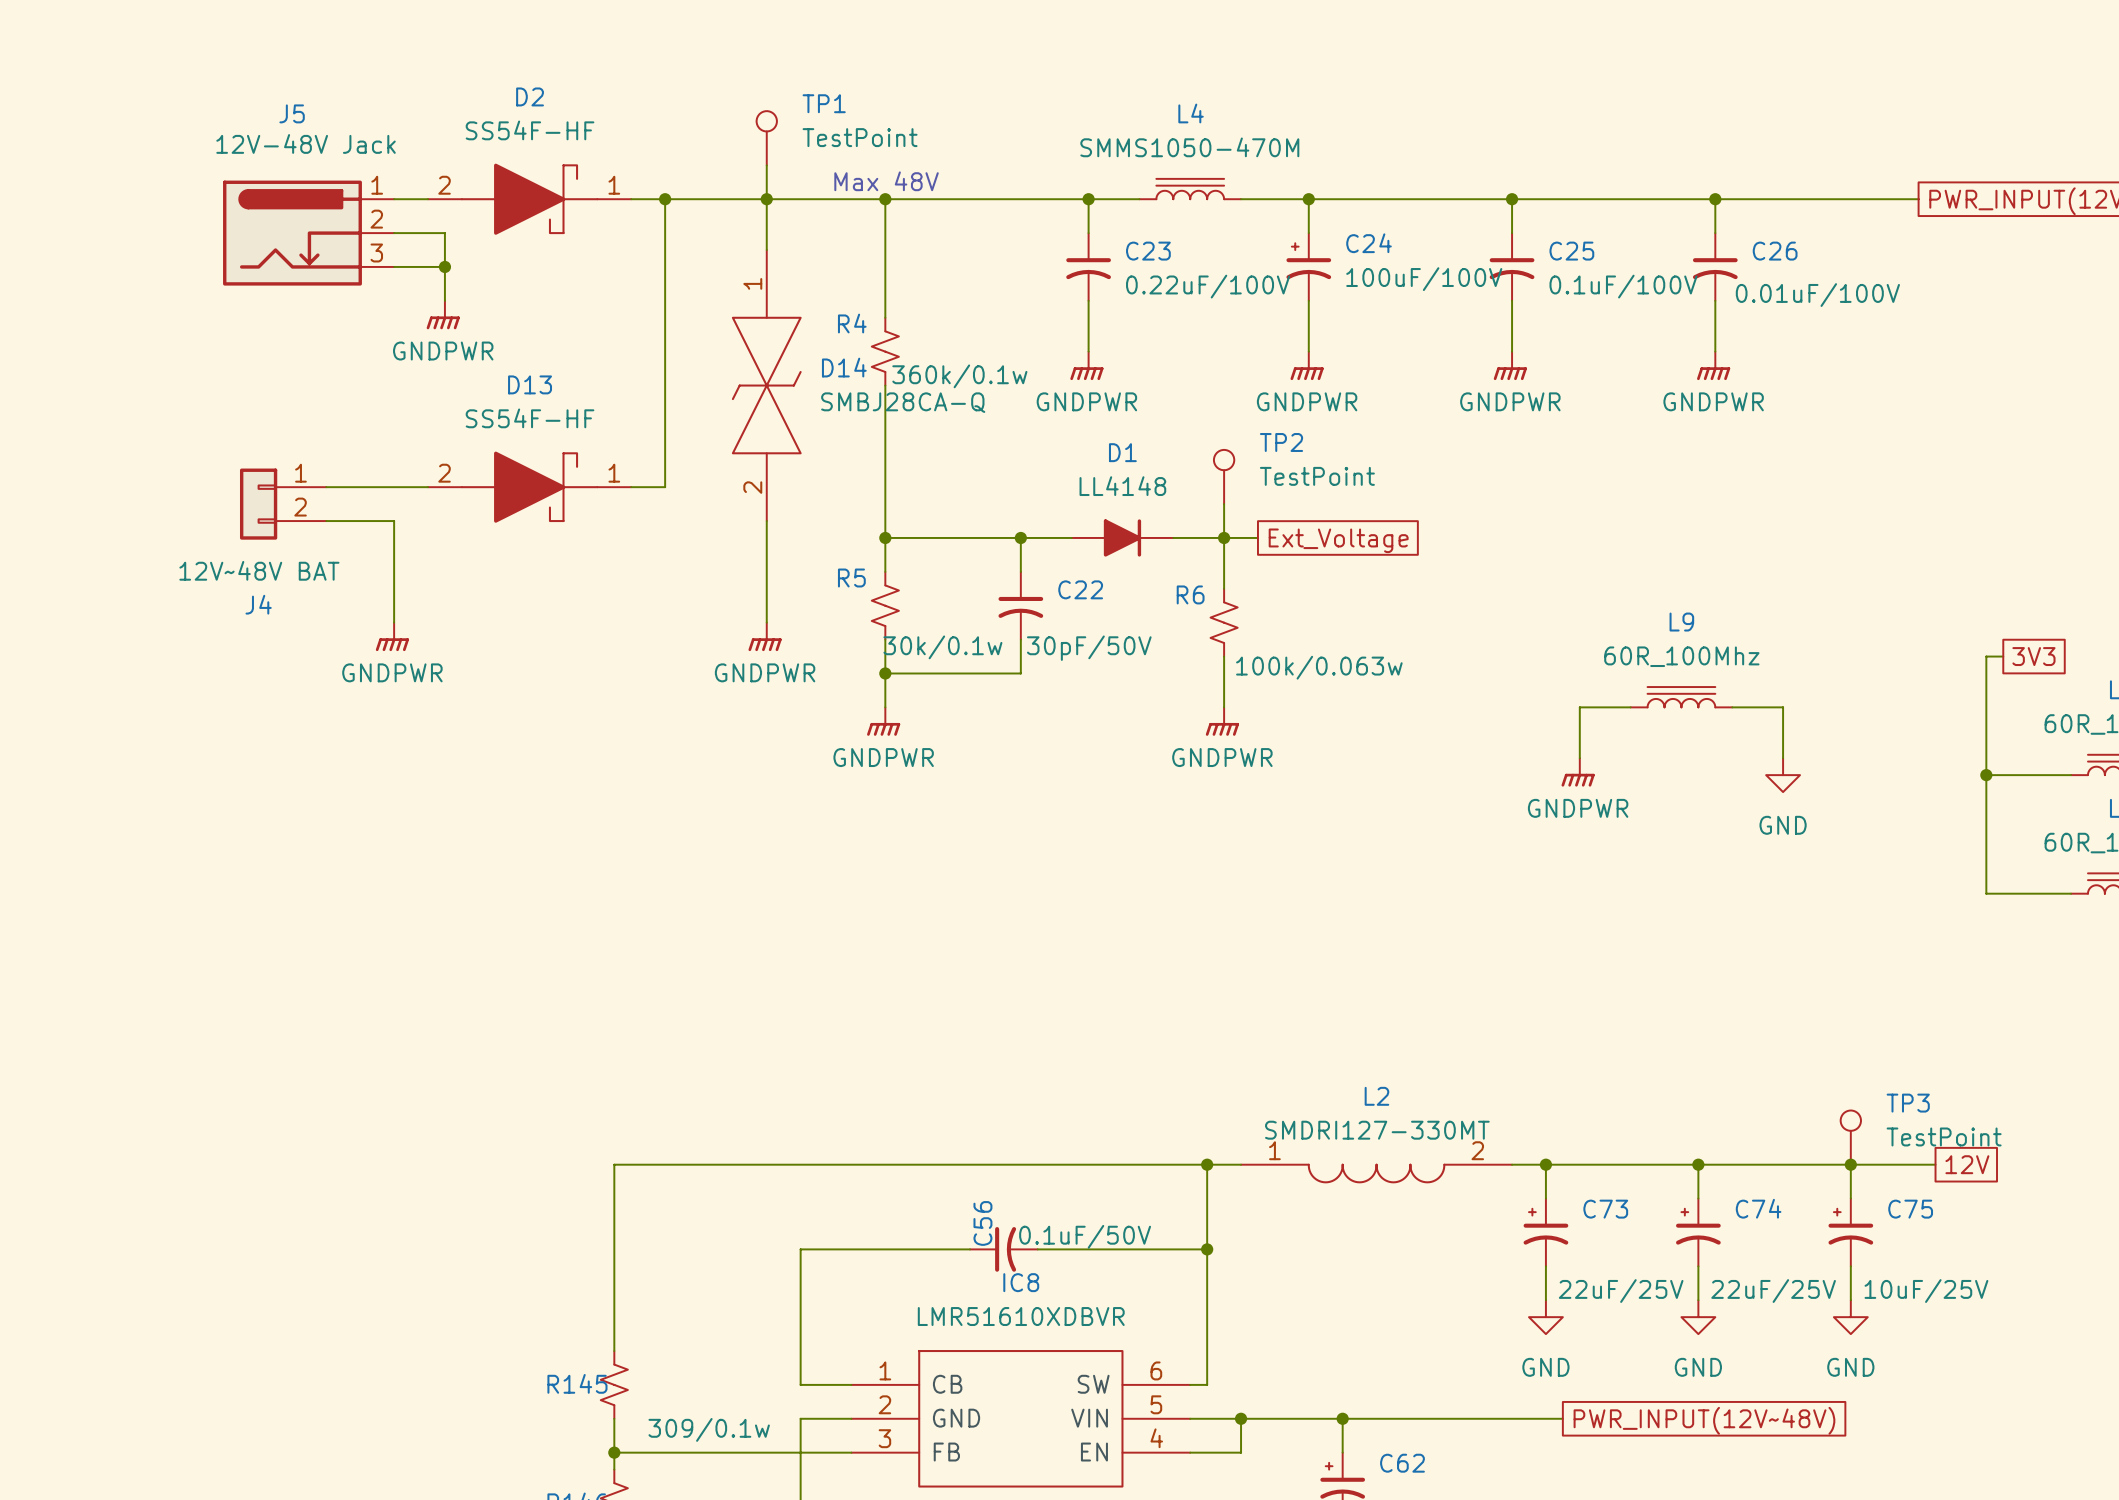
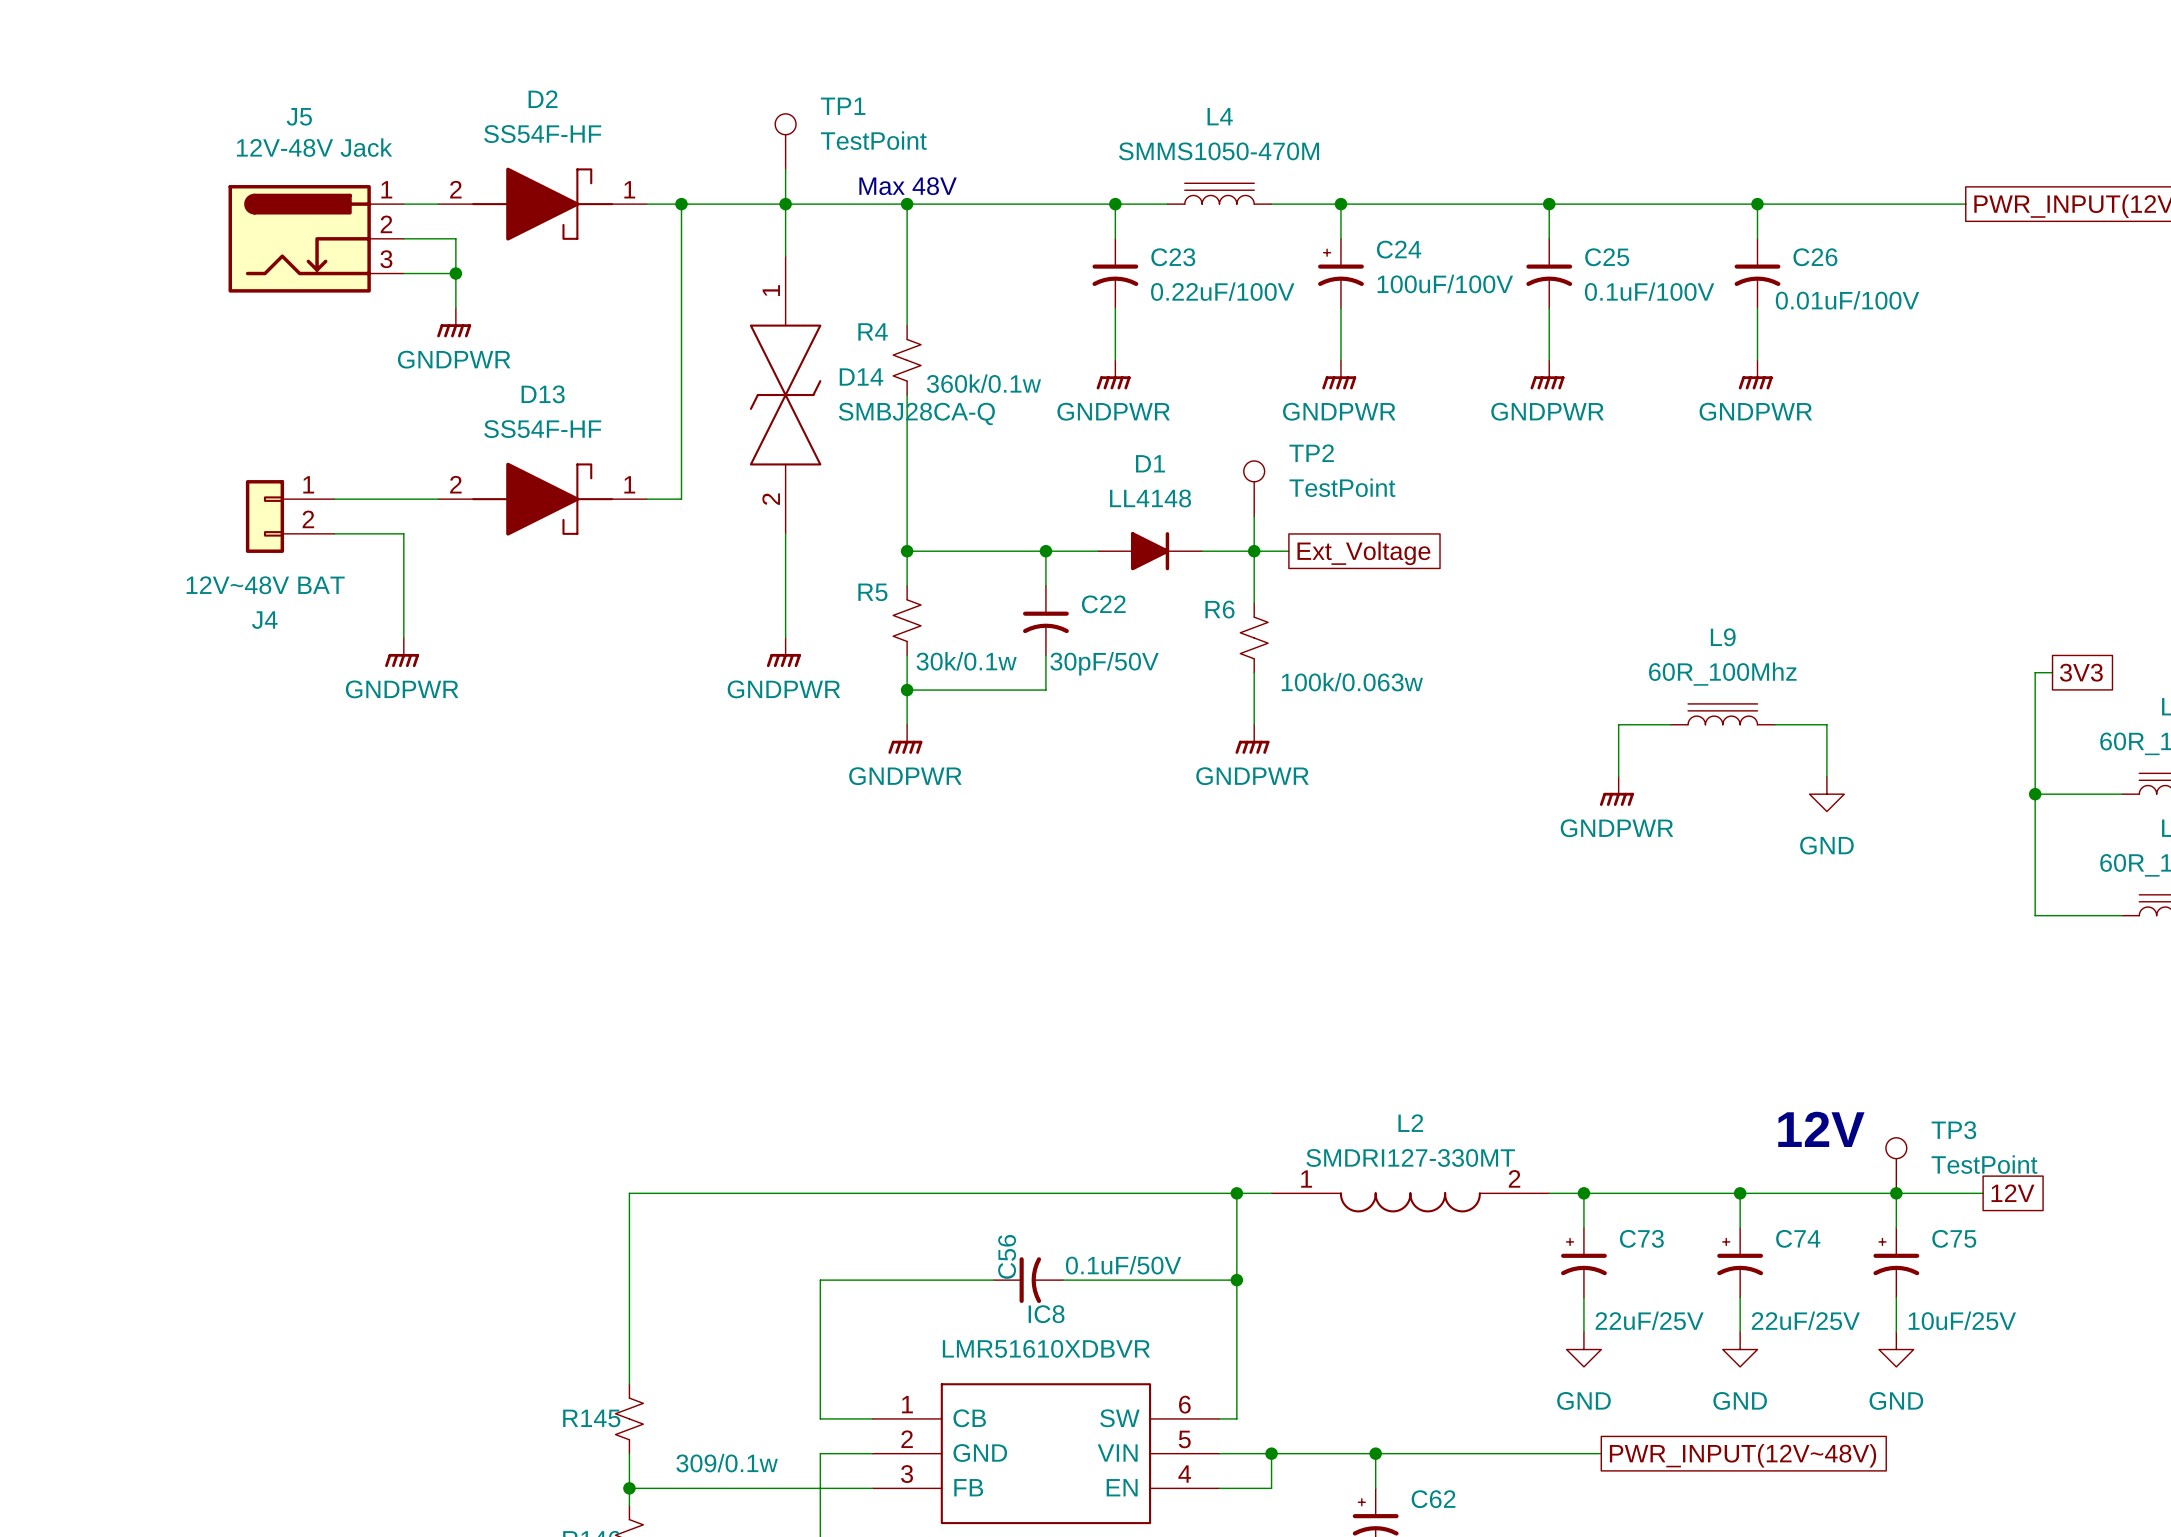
text: none -> 12V (1821, 1129)

